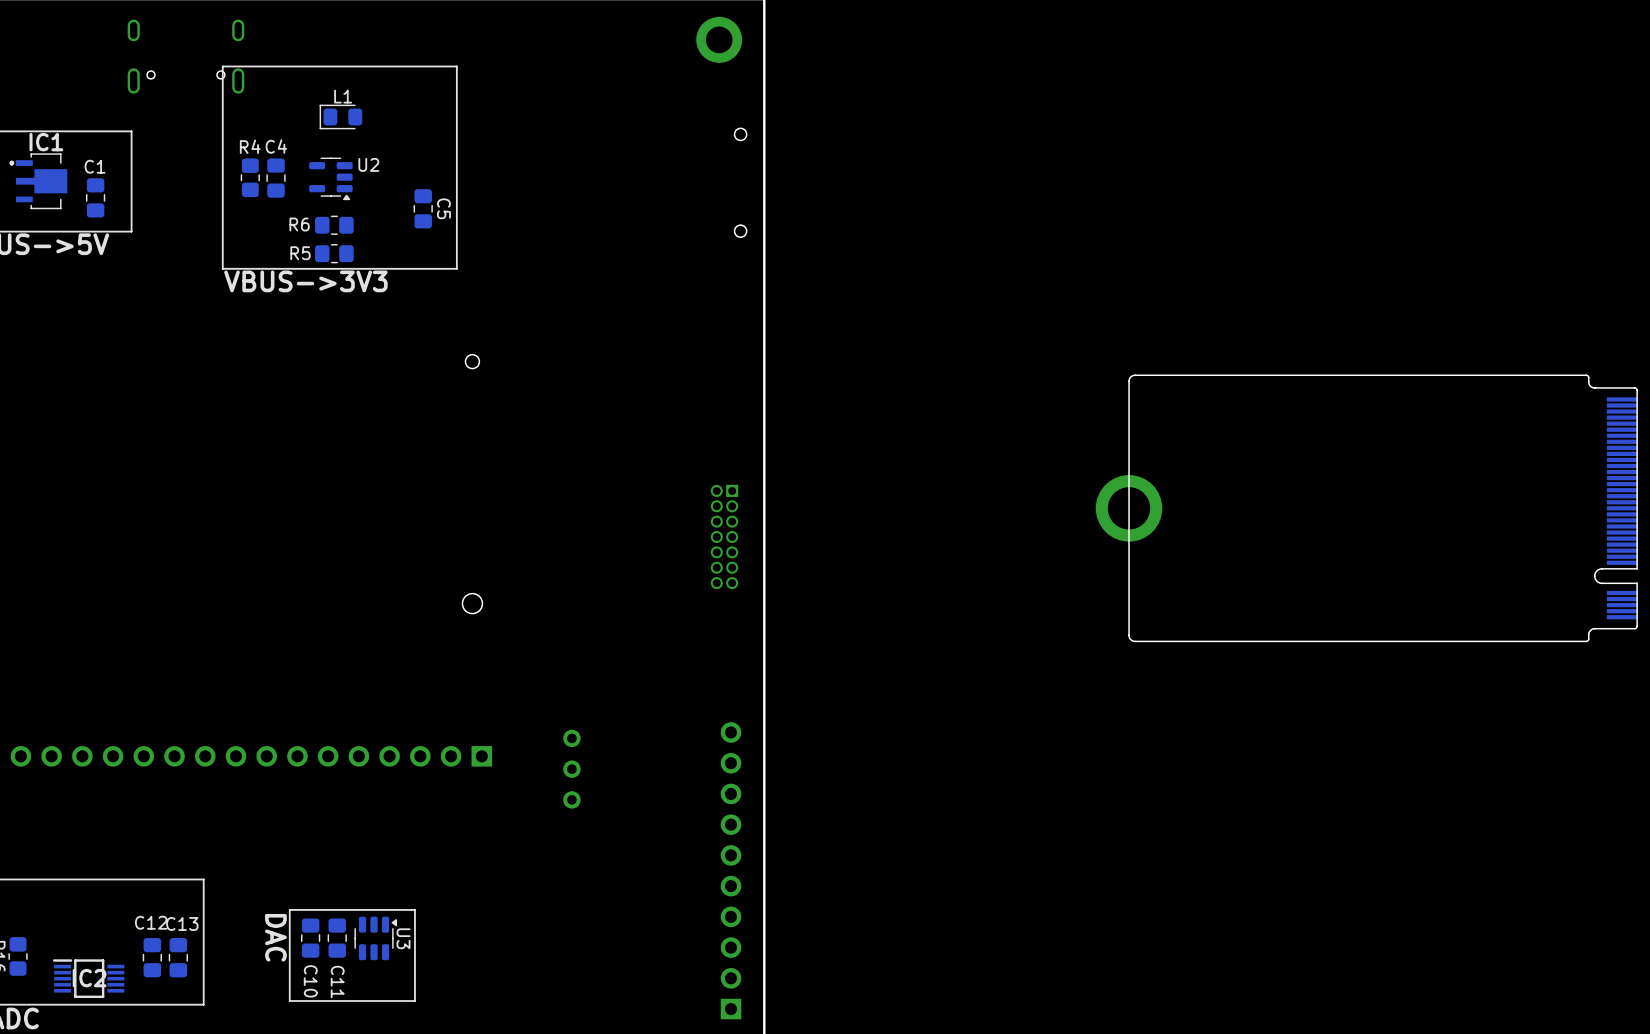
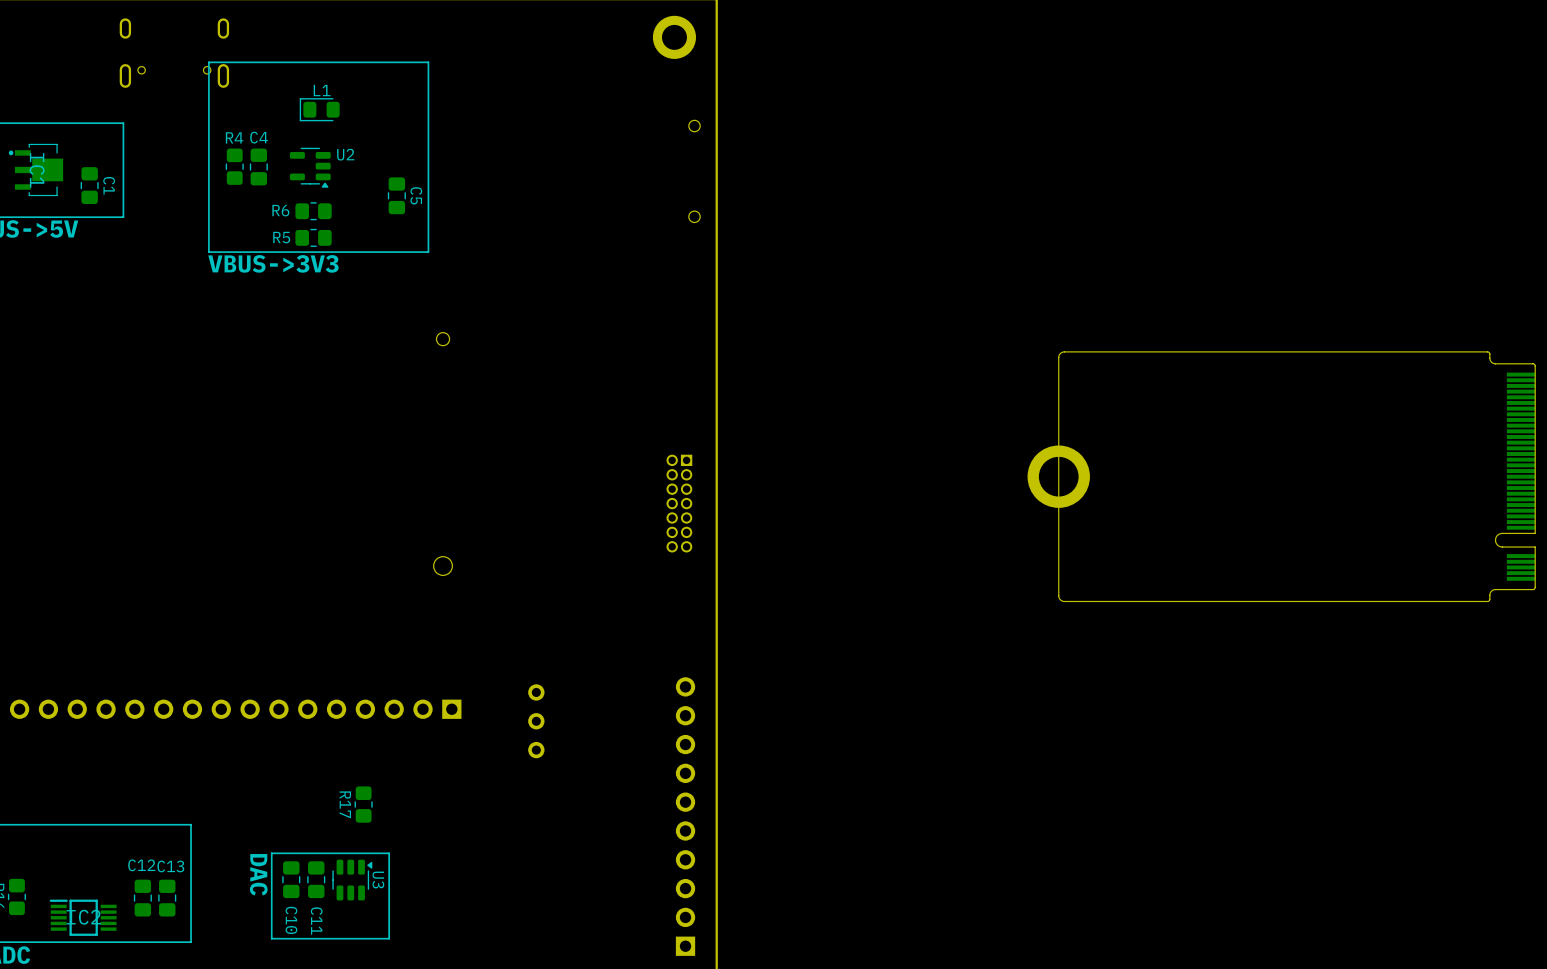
IC1 name rotation: 0° (46, 142) -> 90° clockwise (37, 170)
C1 name rotation: 0° (95, 166) -> 90° clockwise (109, 185)
C1 name position: C1 (95, 166) -> C1 (109, 185)
R17: none -> (363, 804)

